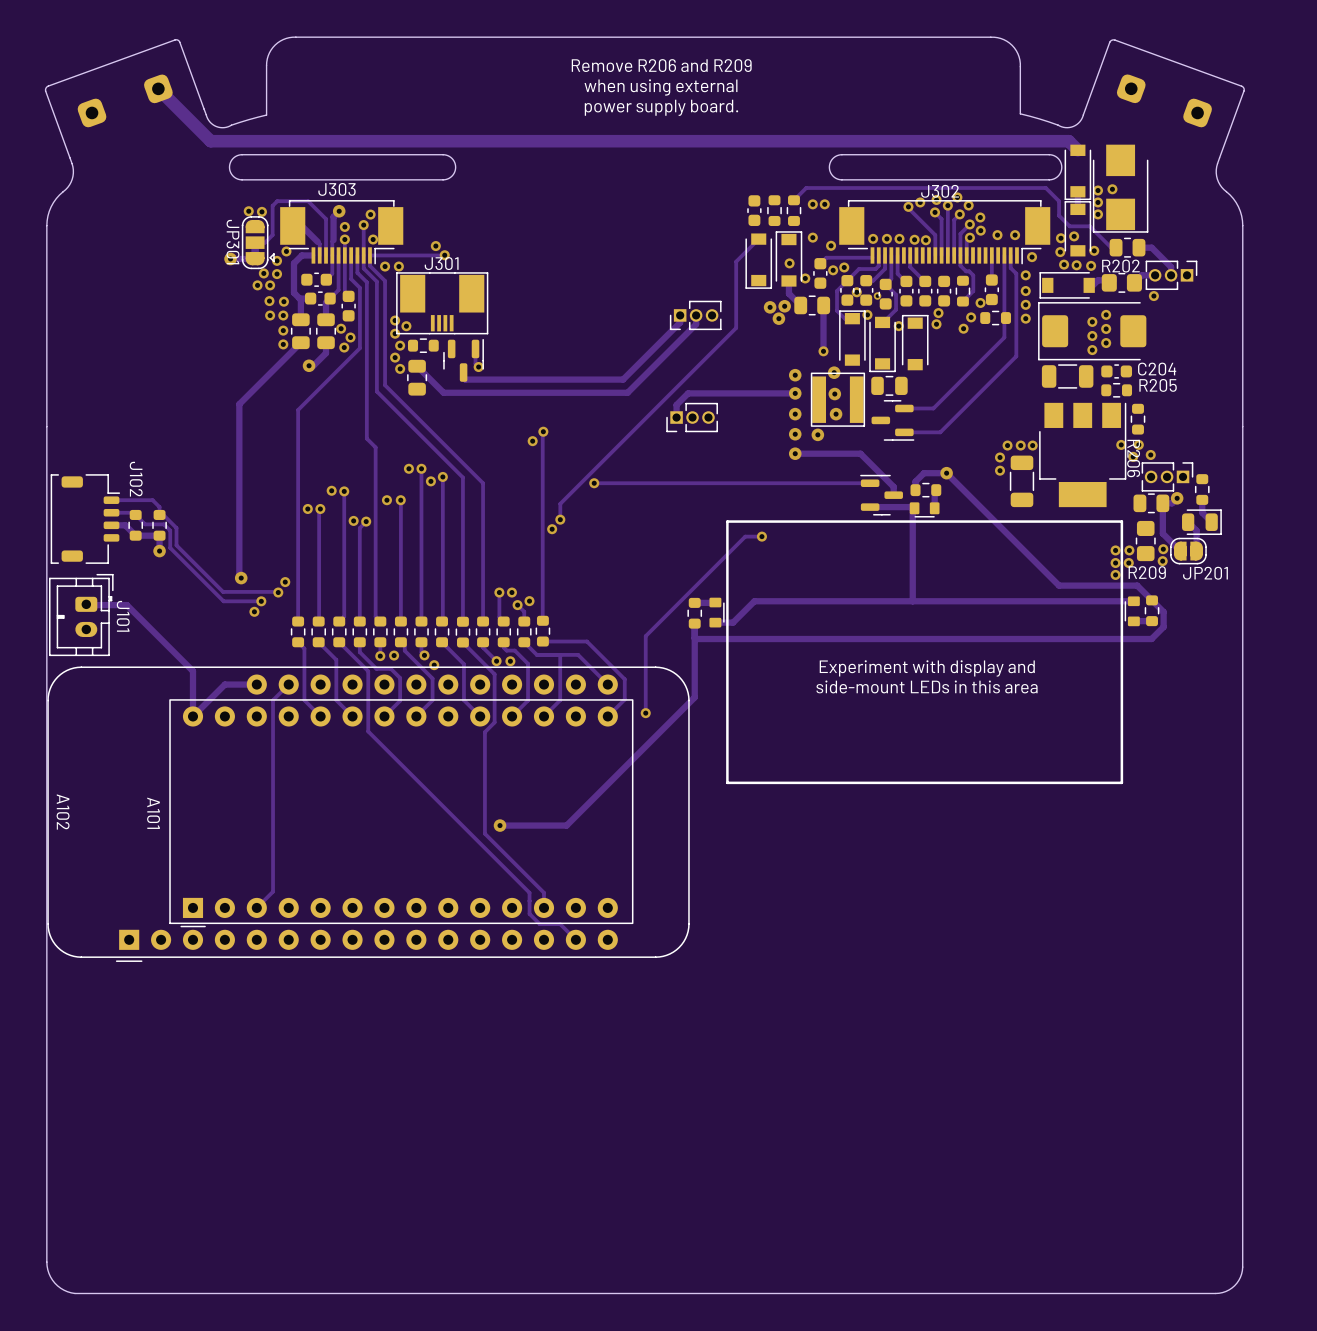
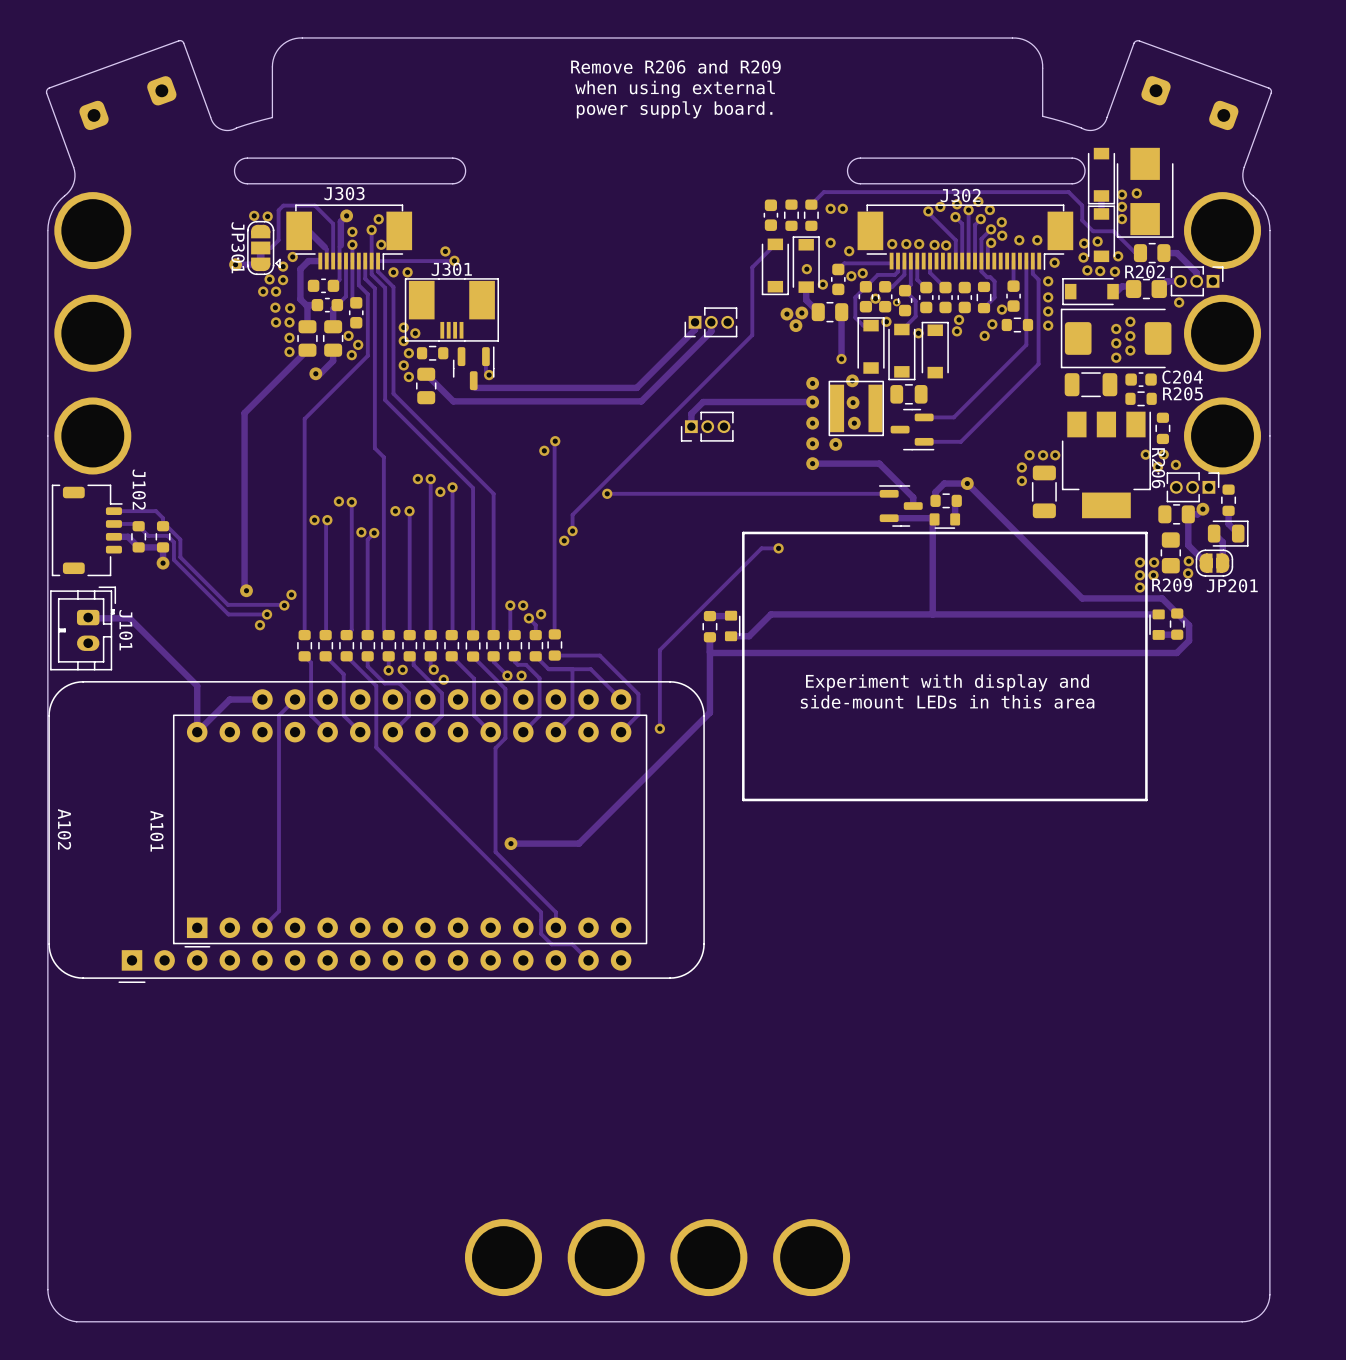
track: (158, 88) (210, 141) (1068, 141) (1077, 150) -> none
part: (124, 98) -> none
part: none -> (658, 679)

